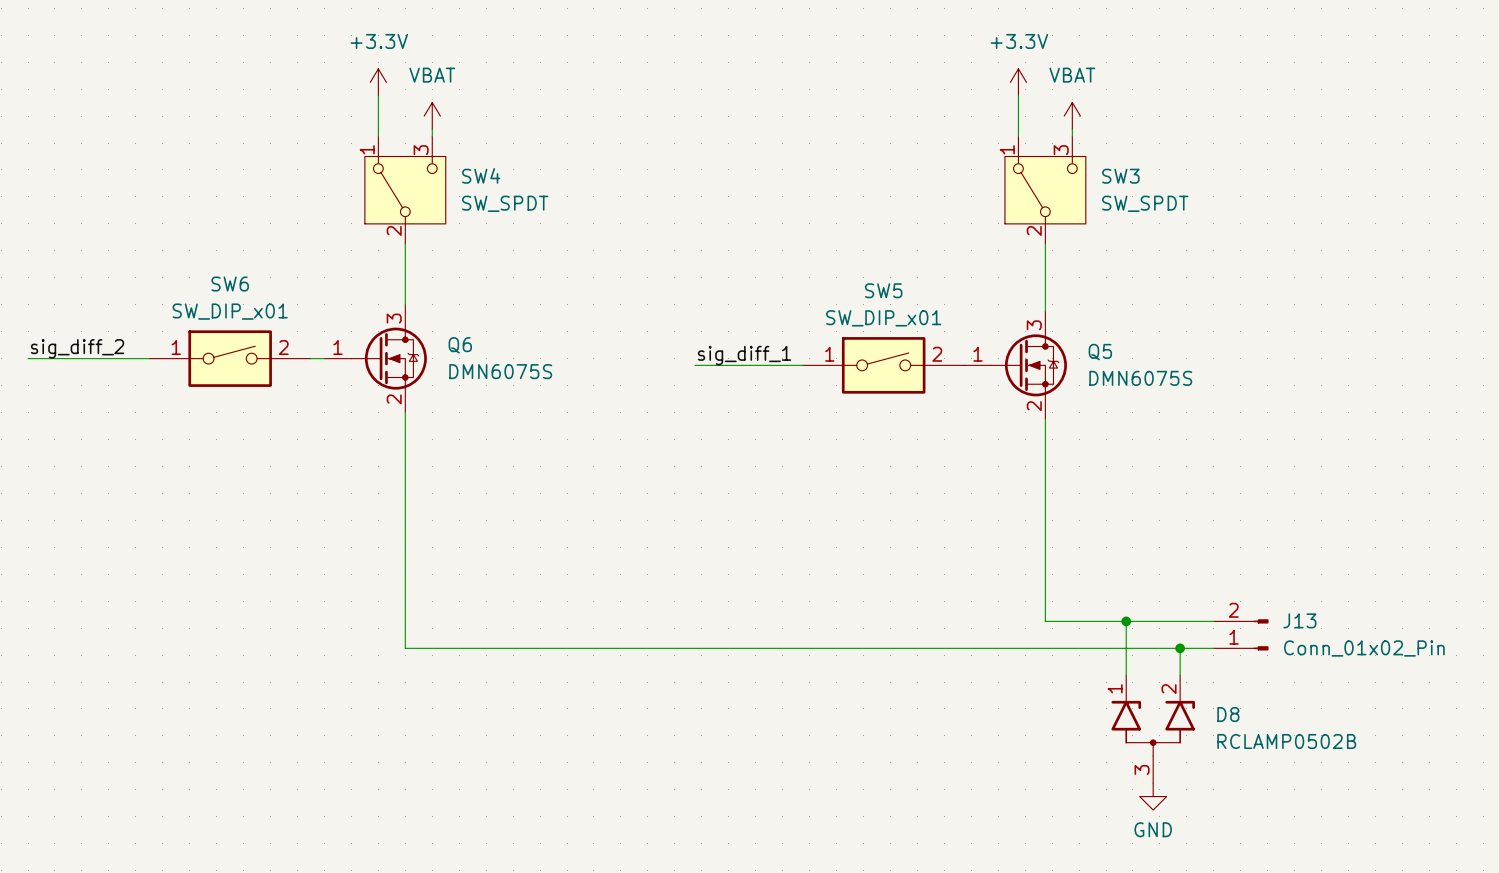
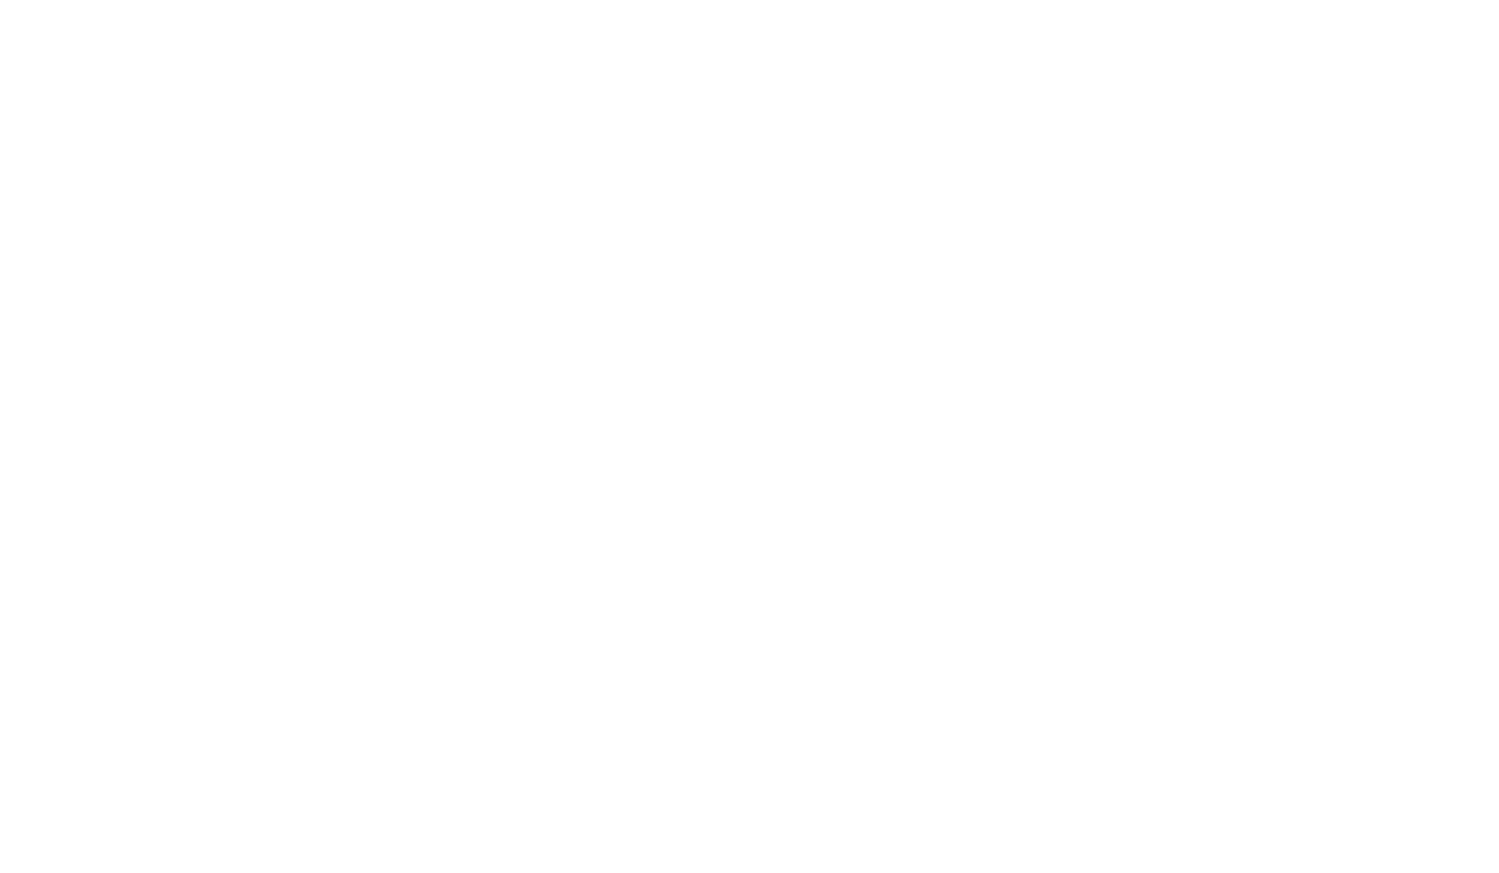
power symbol: +3.3V (378, 82) -> none
power symbol: +3.3V (1018, 82) -> none
wire: (378, 95) (378, 136) -> none
wire: (1018, 95) (1018, 136) -> none
power symbol: VBAT (432, 116) -> none
power symbol: VBAT (1072, 116) -> none
wire: (432, 129) (432, 136) -> none
wire: (1072, 129) (1072, 136) -> none
SW4: SW_SPDT (405, 190) -> none
SW3: SW_SPDT (1045, 190) -> none
wire: (405, 244) (405, 304) -> none
wire: (1045, 244) (1045, 311) -> none
label: sig_diff_2 (77, 348) -> none
label: sig_diff_1 (744, 355) -> none
wire: (28, 358) (149, 358) -> none
SW6: SW_DIP_x01 (230, 358) -> none
wire: (310, 358) (324, 358) -> none
Q6: DMN6075S (375, 358) -> none
wire: (695, 365) (802, 365) -> none
SW5: SW_DIP_x01 (883, 365) -> none
Q5: DMN6075S (1015, 365) -> none
wire: (405, 412) (405, 648) (1213, 648) -> none
wire: (1045, 419) (1045, 621) (1213, 621) -> none
wire: (1126, 621) (1126, 675) -> none
junction: (1126, 621) -> none
J13: Conn_01x02_Pin (1241, 634) -> none
wire: (1180, 648) (1180, 675) -> none
junction: (1180, 648) -> none
D8: RCLAMP0502B (1153, 729) -> none
power symbol: GND (1153, 796) -> none

